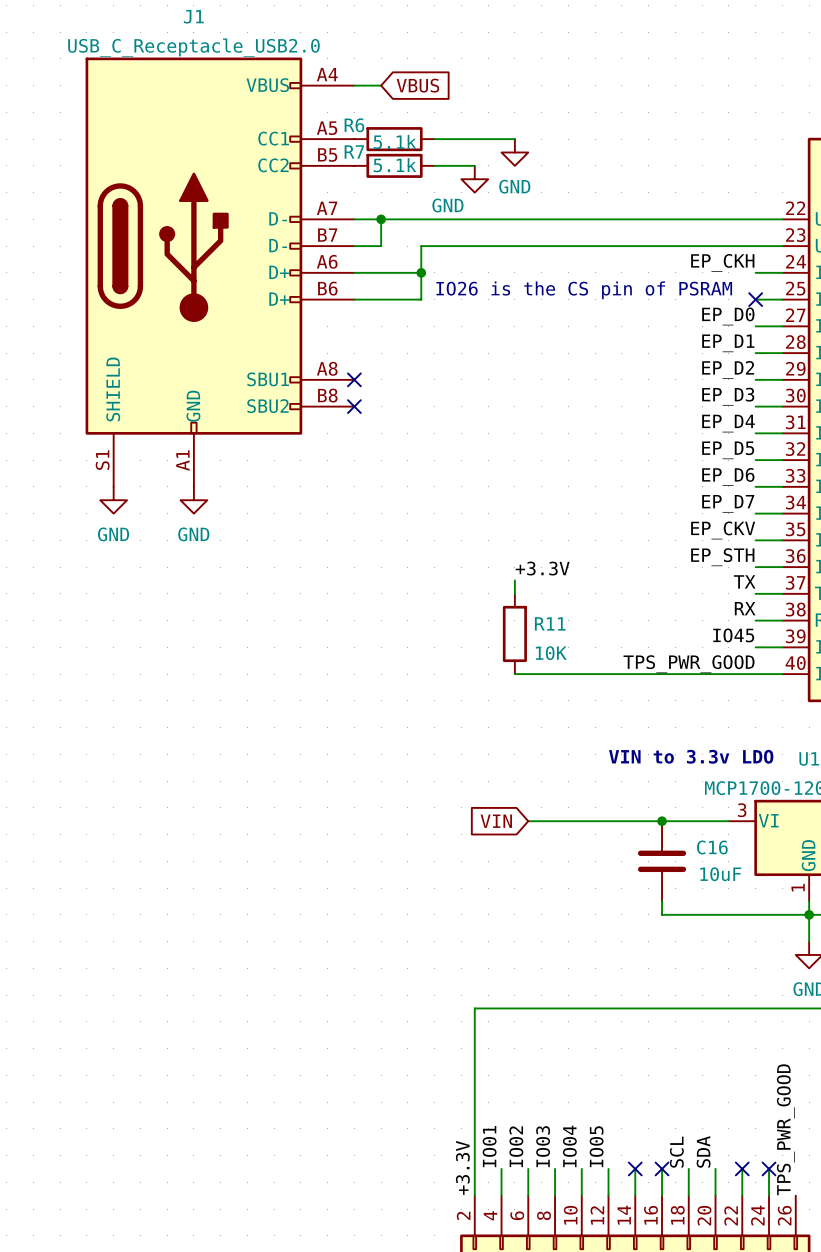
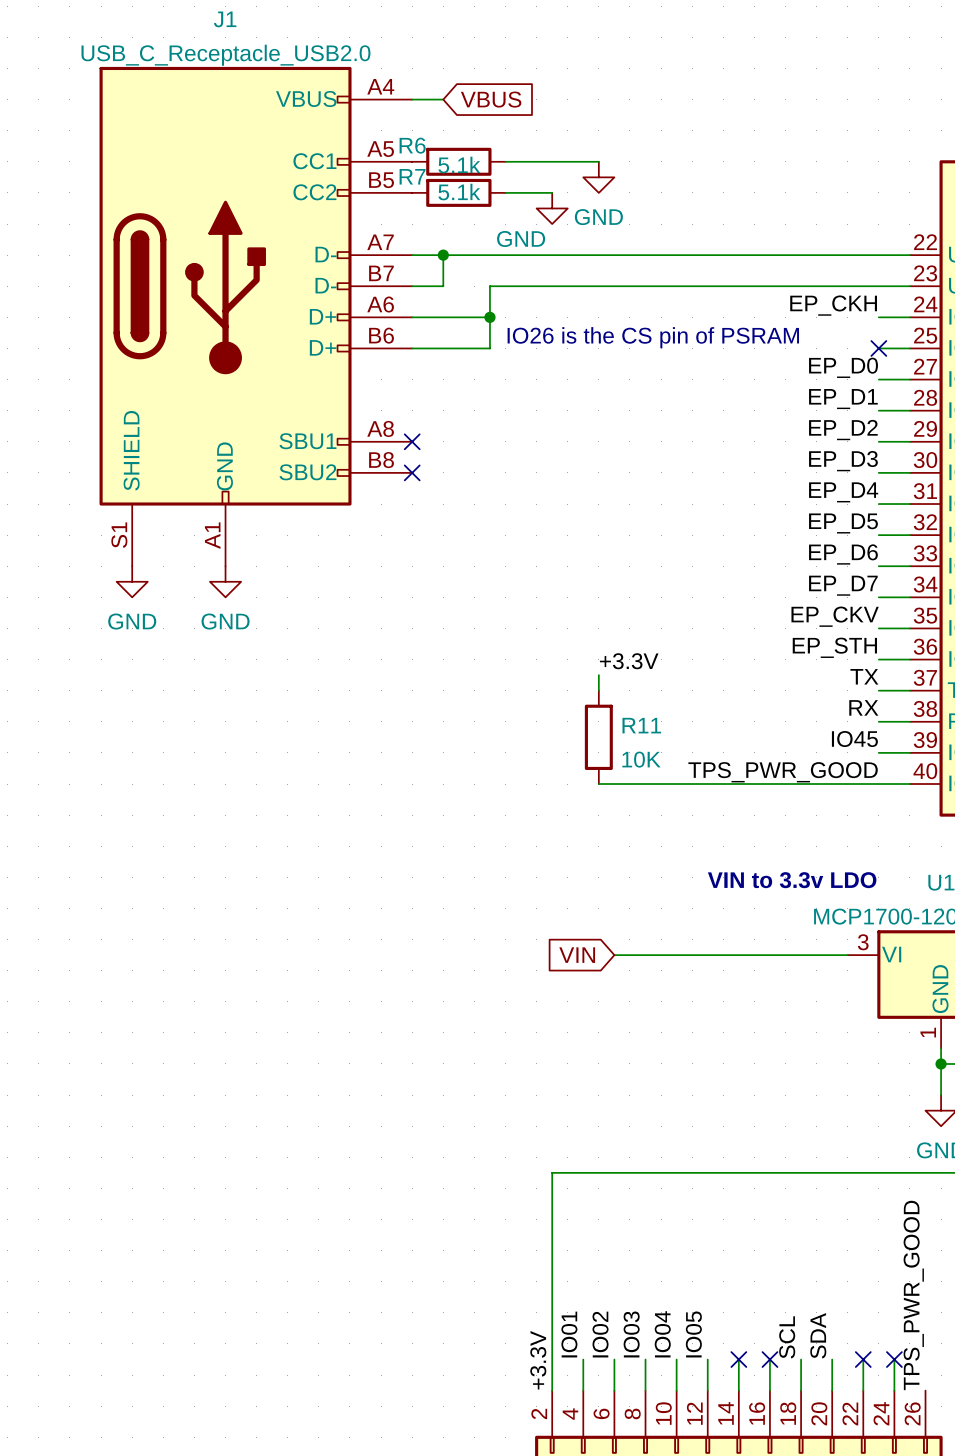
junction: (662, 821) -> none
C16: 10uF (662, 861) -> none
wire: (662, 901) (662, 914) (809, 914) -> none

